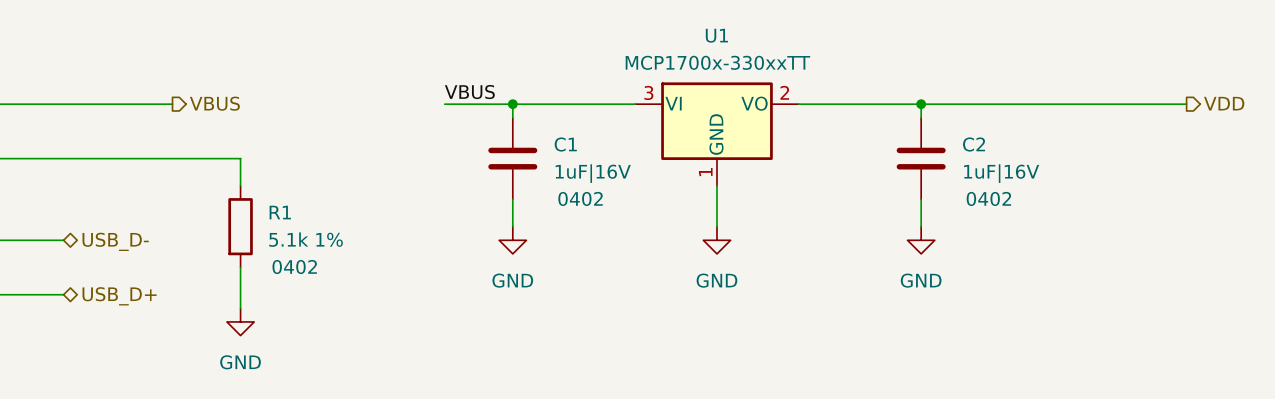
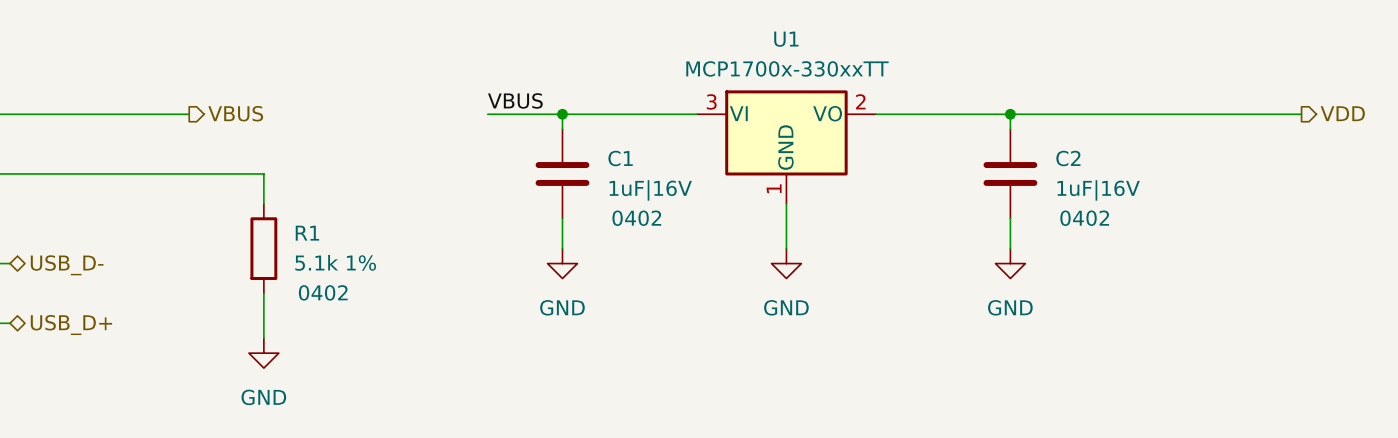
wire: (9, 240) (63, 240) -> none
hierarchical label position: USB_D- (115, 241) -> USB_D- (67, 265)
wire: (9, 294) (63, 294) -> none
hierarchical label position: USB_D+ (119, 296) -> USB_D+ (71, 325)

